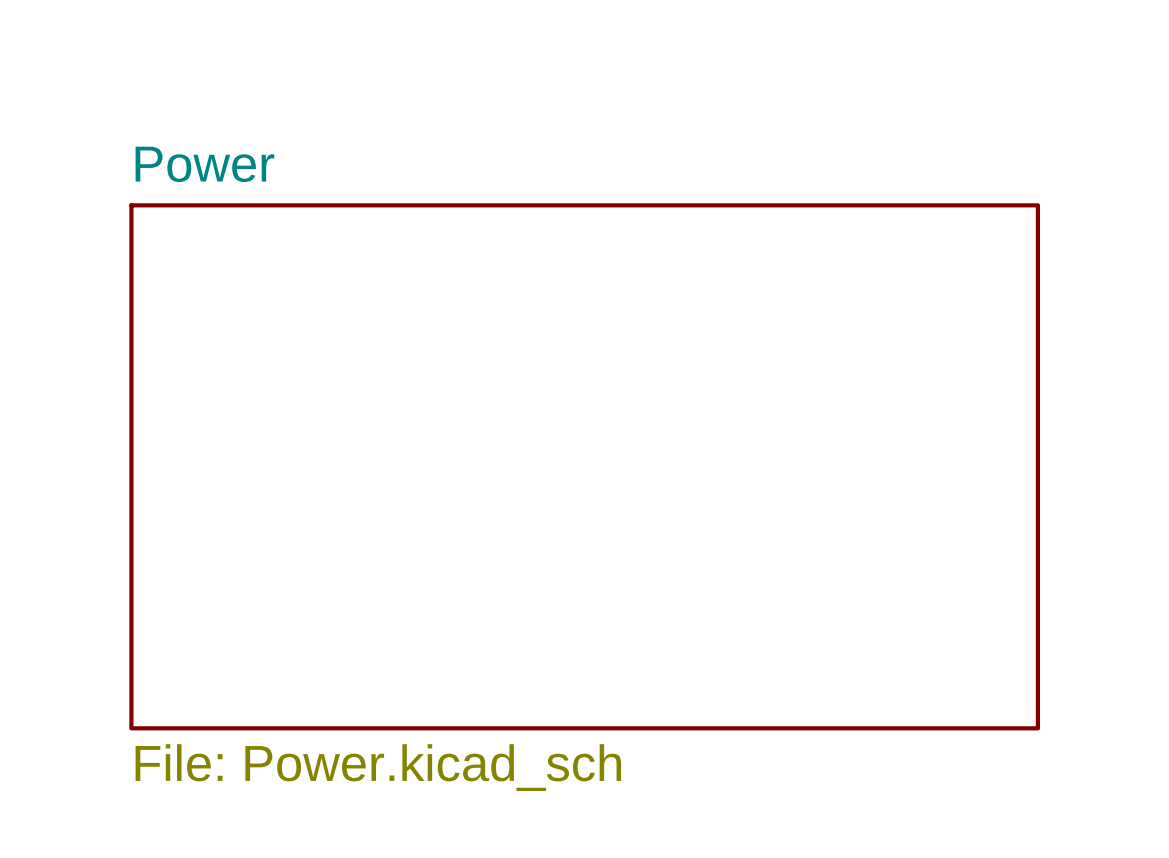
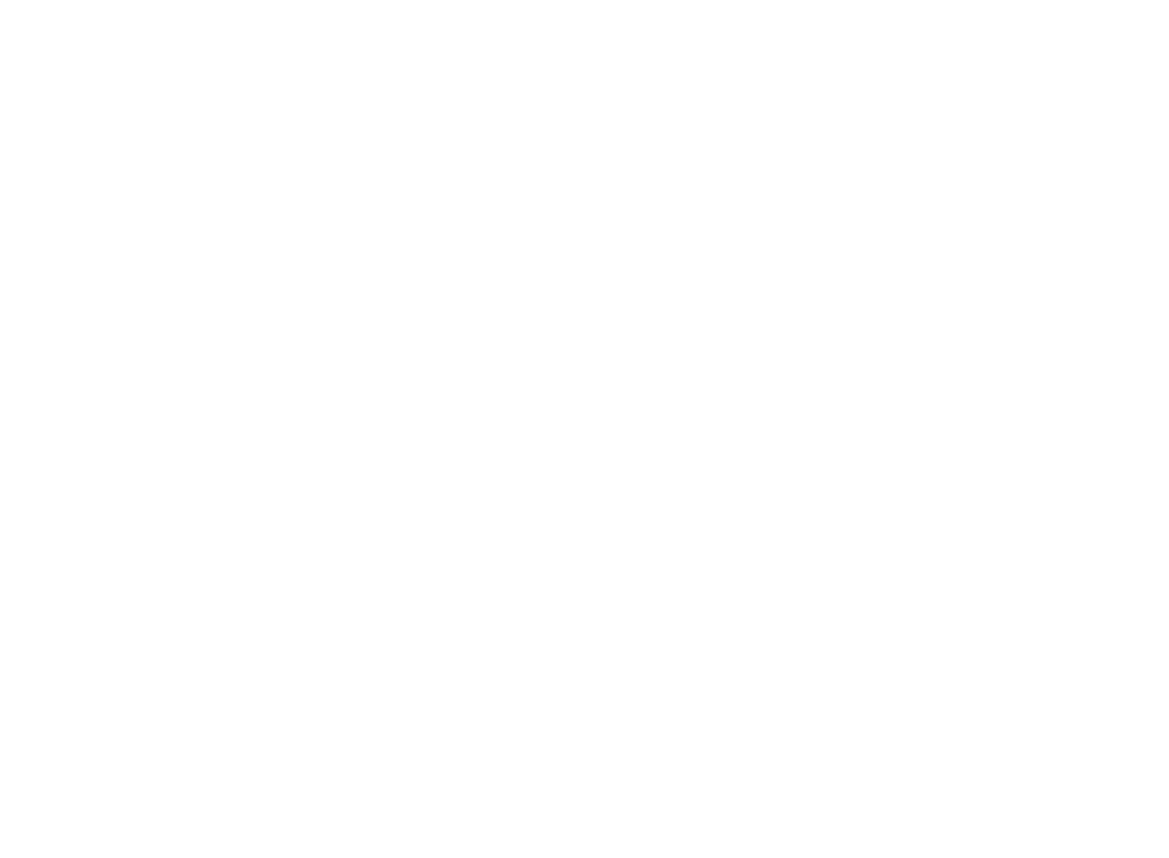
sheet Power: File: Power.kicad_sch (584, 466) -> none

